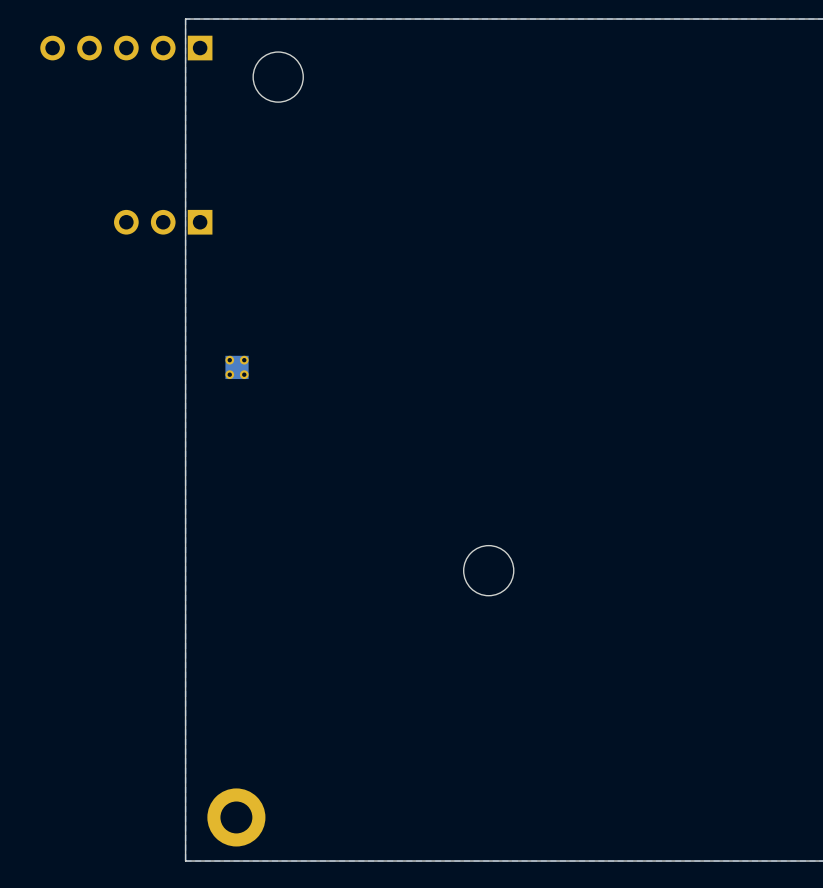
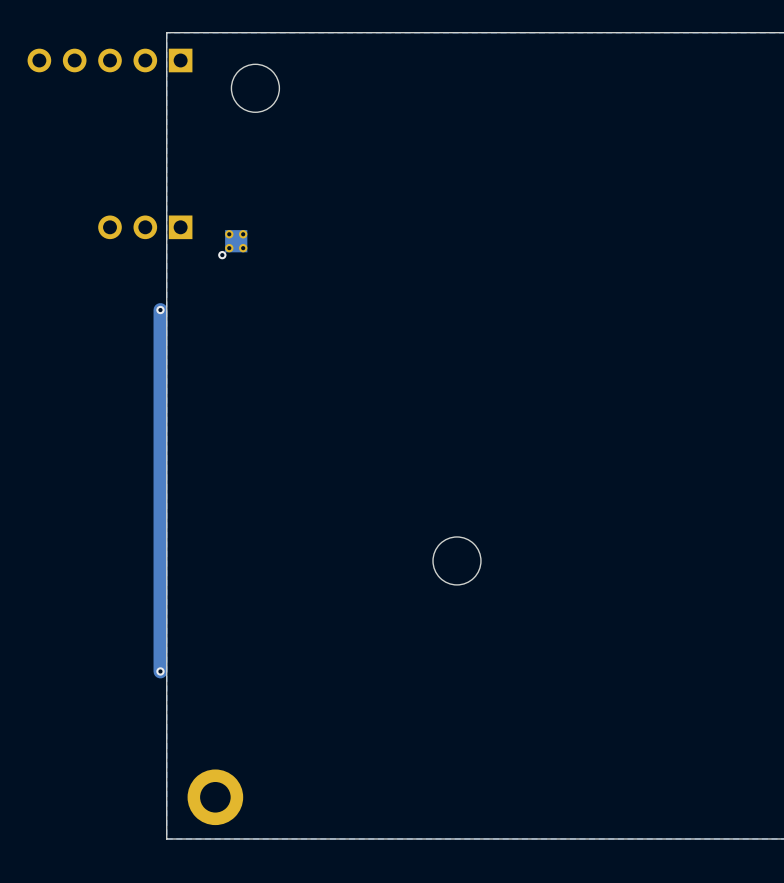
via: none -> (222, 255)
track: none -> (160, 310) (160, 671)
via: none -> (160, 310)
part position: (237, 367) -> (236, 241)
via: none -> (160, 671)

